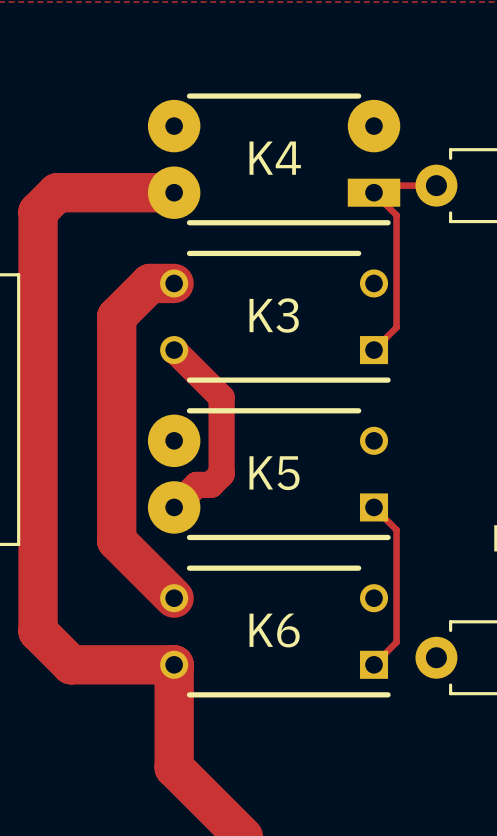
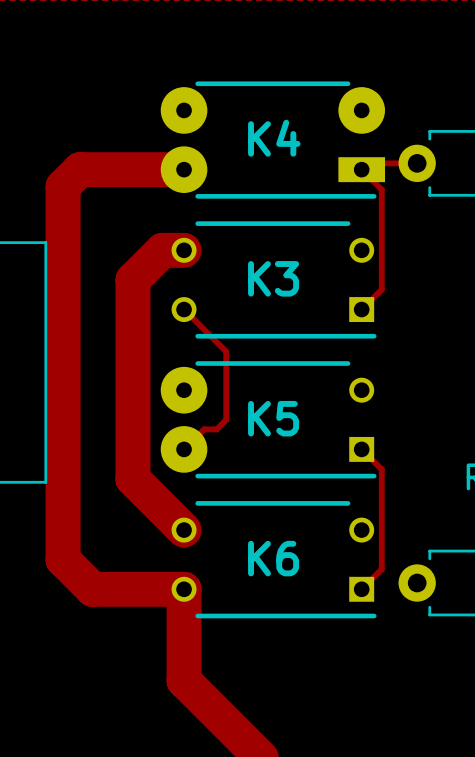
track width: thick (174, 350) (221, 397) (221, 474) (210, 484) (196, 484) (174, 507) -> thin (184, 309) (226, 351) (226, 419) (216, 429) (204, 429) (184, 449)

